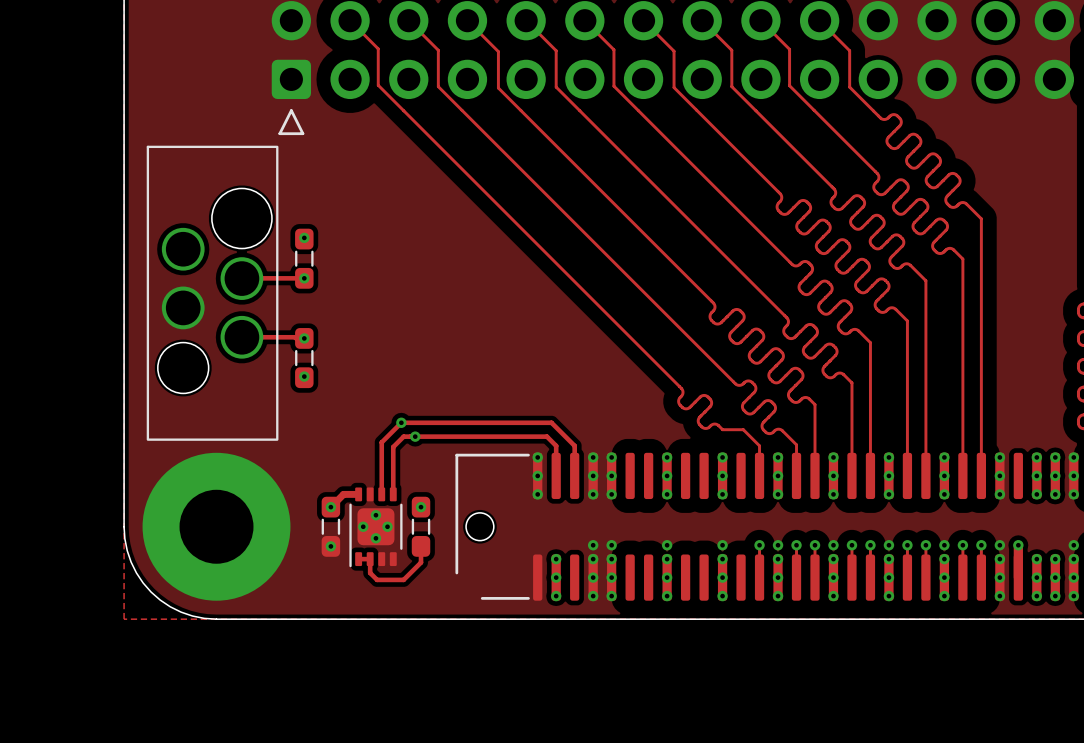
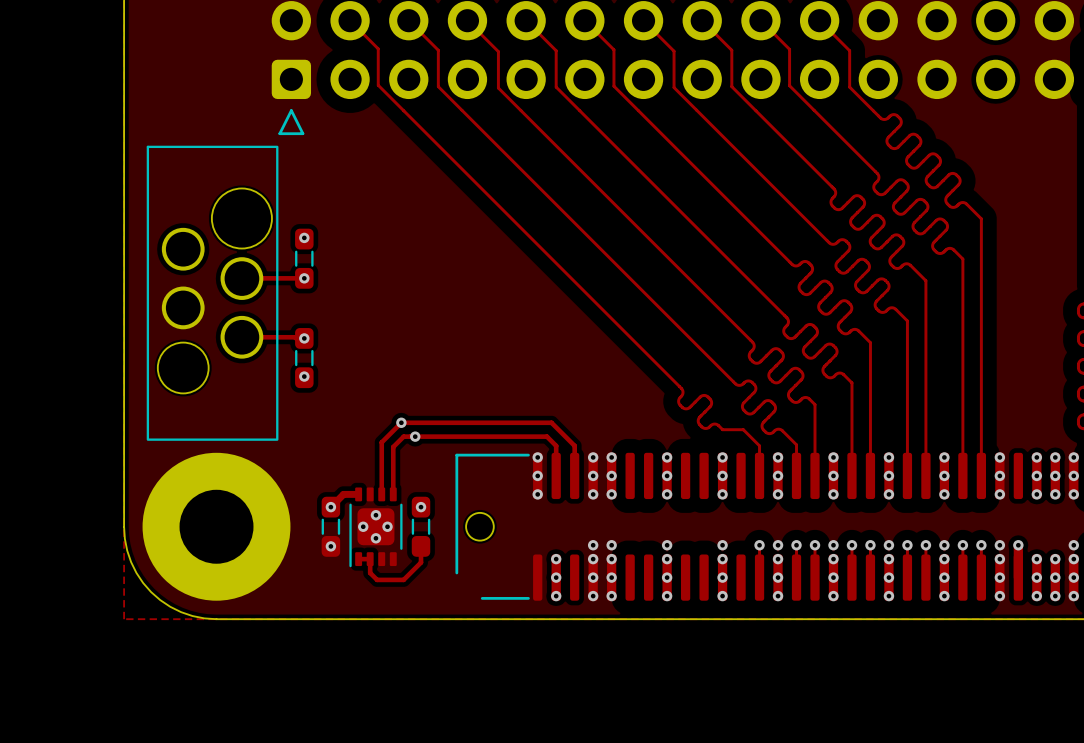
track: (780, 193) (781, 199) (777, 207) (782, 214) (788, 213) (801, 200) (805, 200) (810, 205) (809, 210) (796, 225) (797, 229) (801, 233) (807, 233) (820, 220) (825, 220) (829, 224) (829, 230) (816, 244) (820, 252) (826, 252) (837, 242) -> (780, 193) (829, 243) (837, 242)
track: (713, 303) (714, 308) (710, 317) (715, 323) (720, 322) (734, 309) (739, 309) (743, 314) (743, 319) (729, 334) (730, 338) (734, 342) (740, 342) (754, 329) (758, 329) (762, 333) (762, 339) (752, 350) -> (713, 303) (753, 342) (752, 350)

